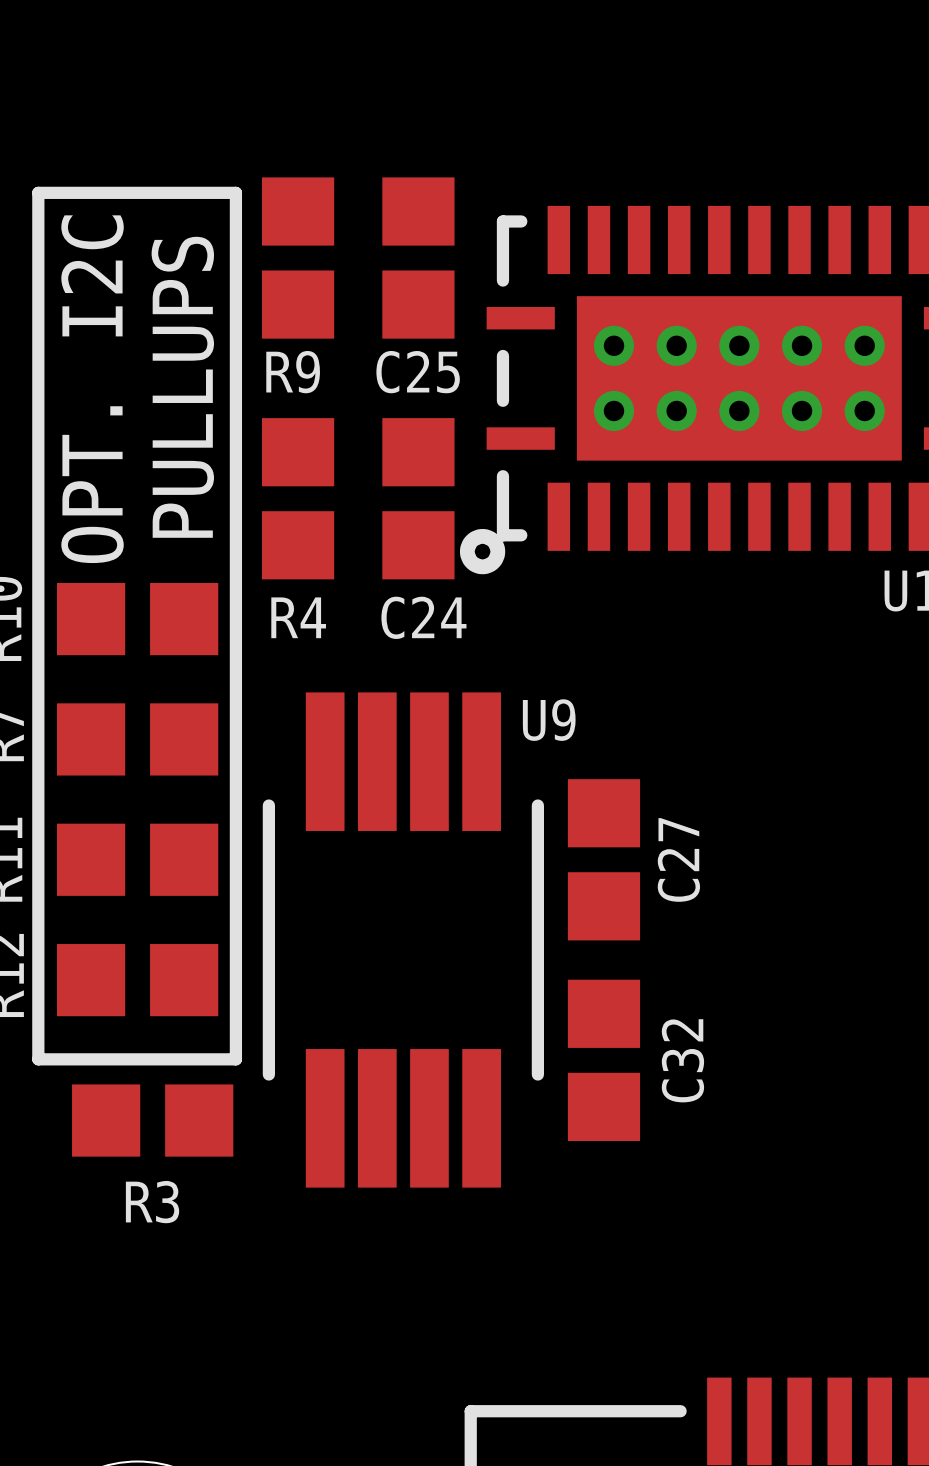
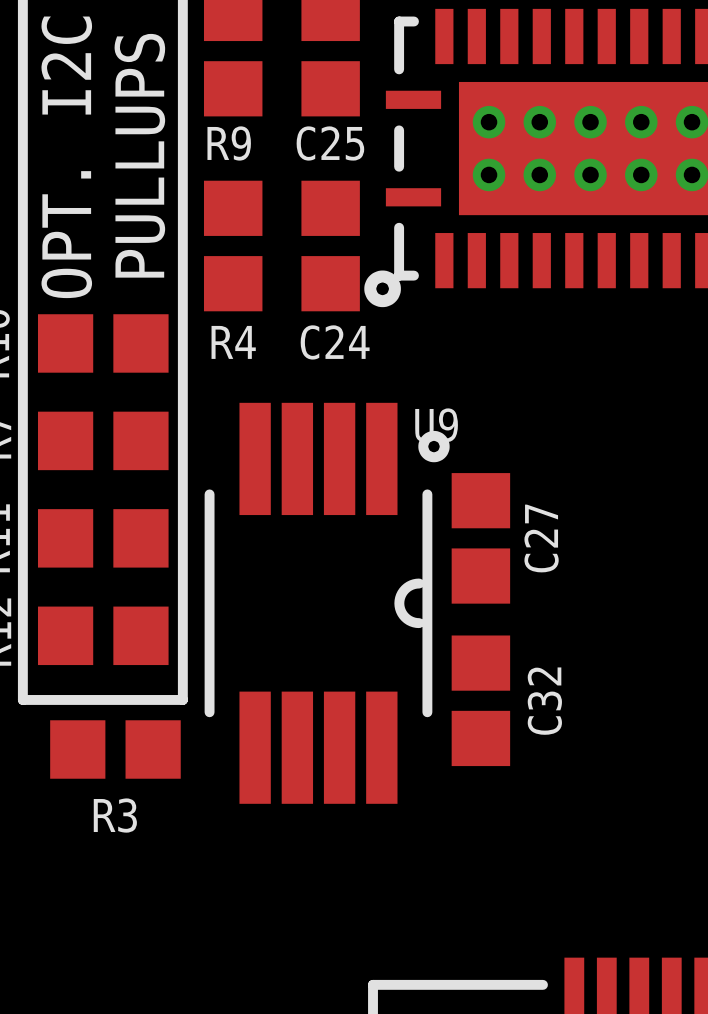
U9 footprint: [262, 692, 545, 1188] -> [204, 402, 450, 804]

